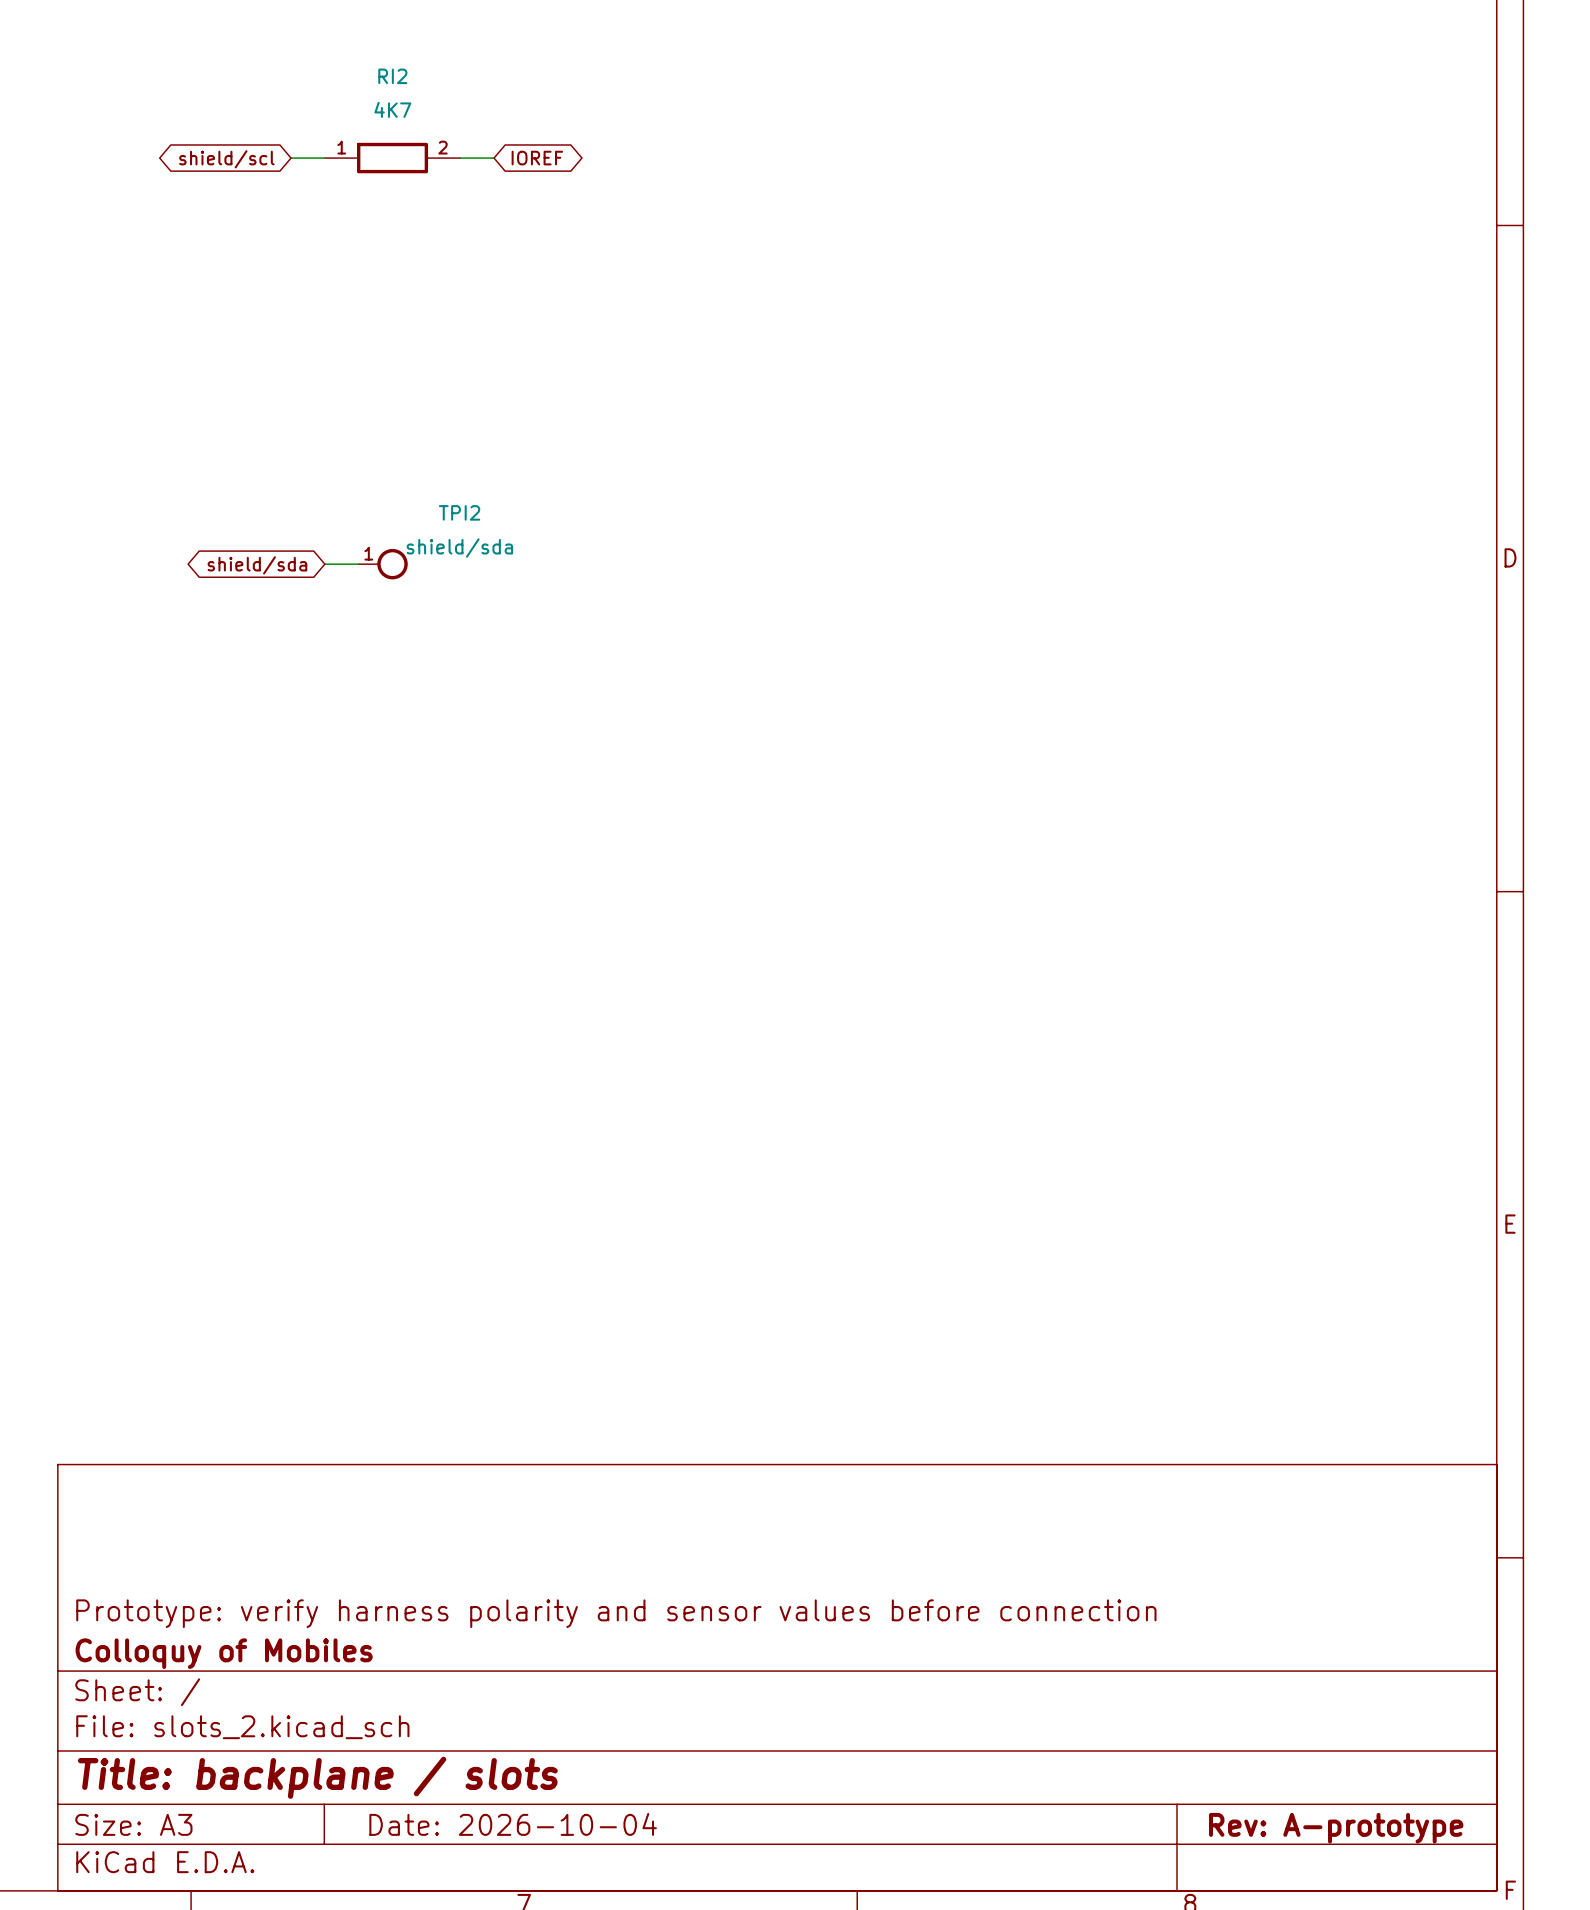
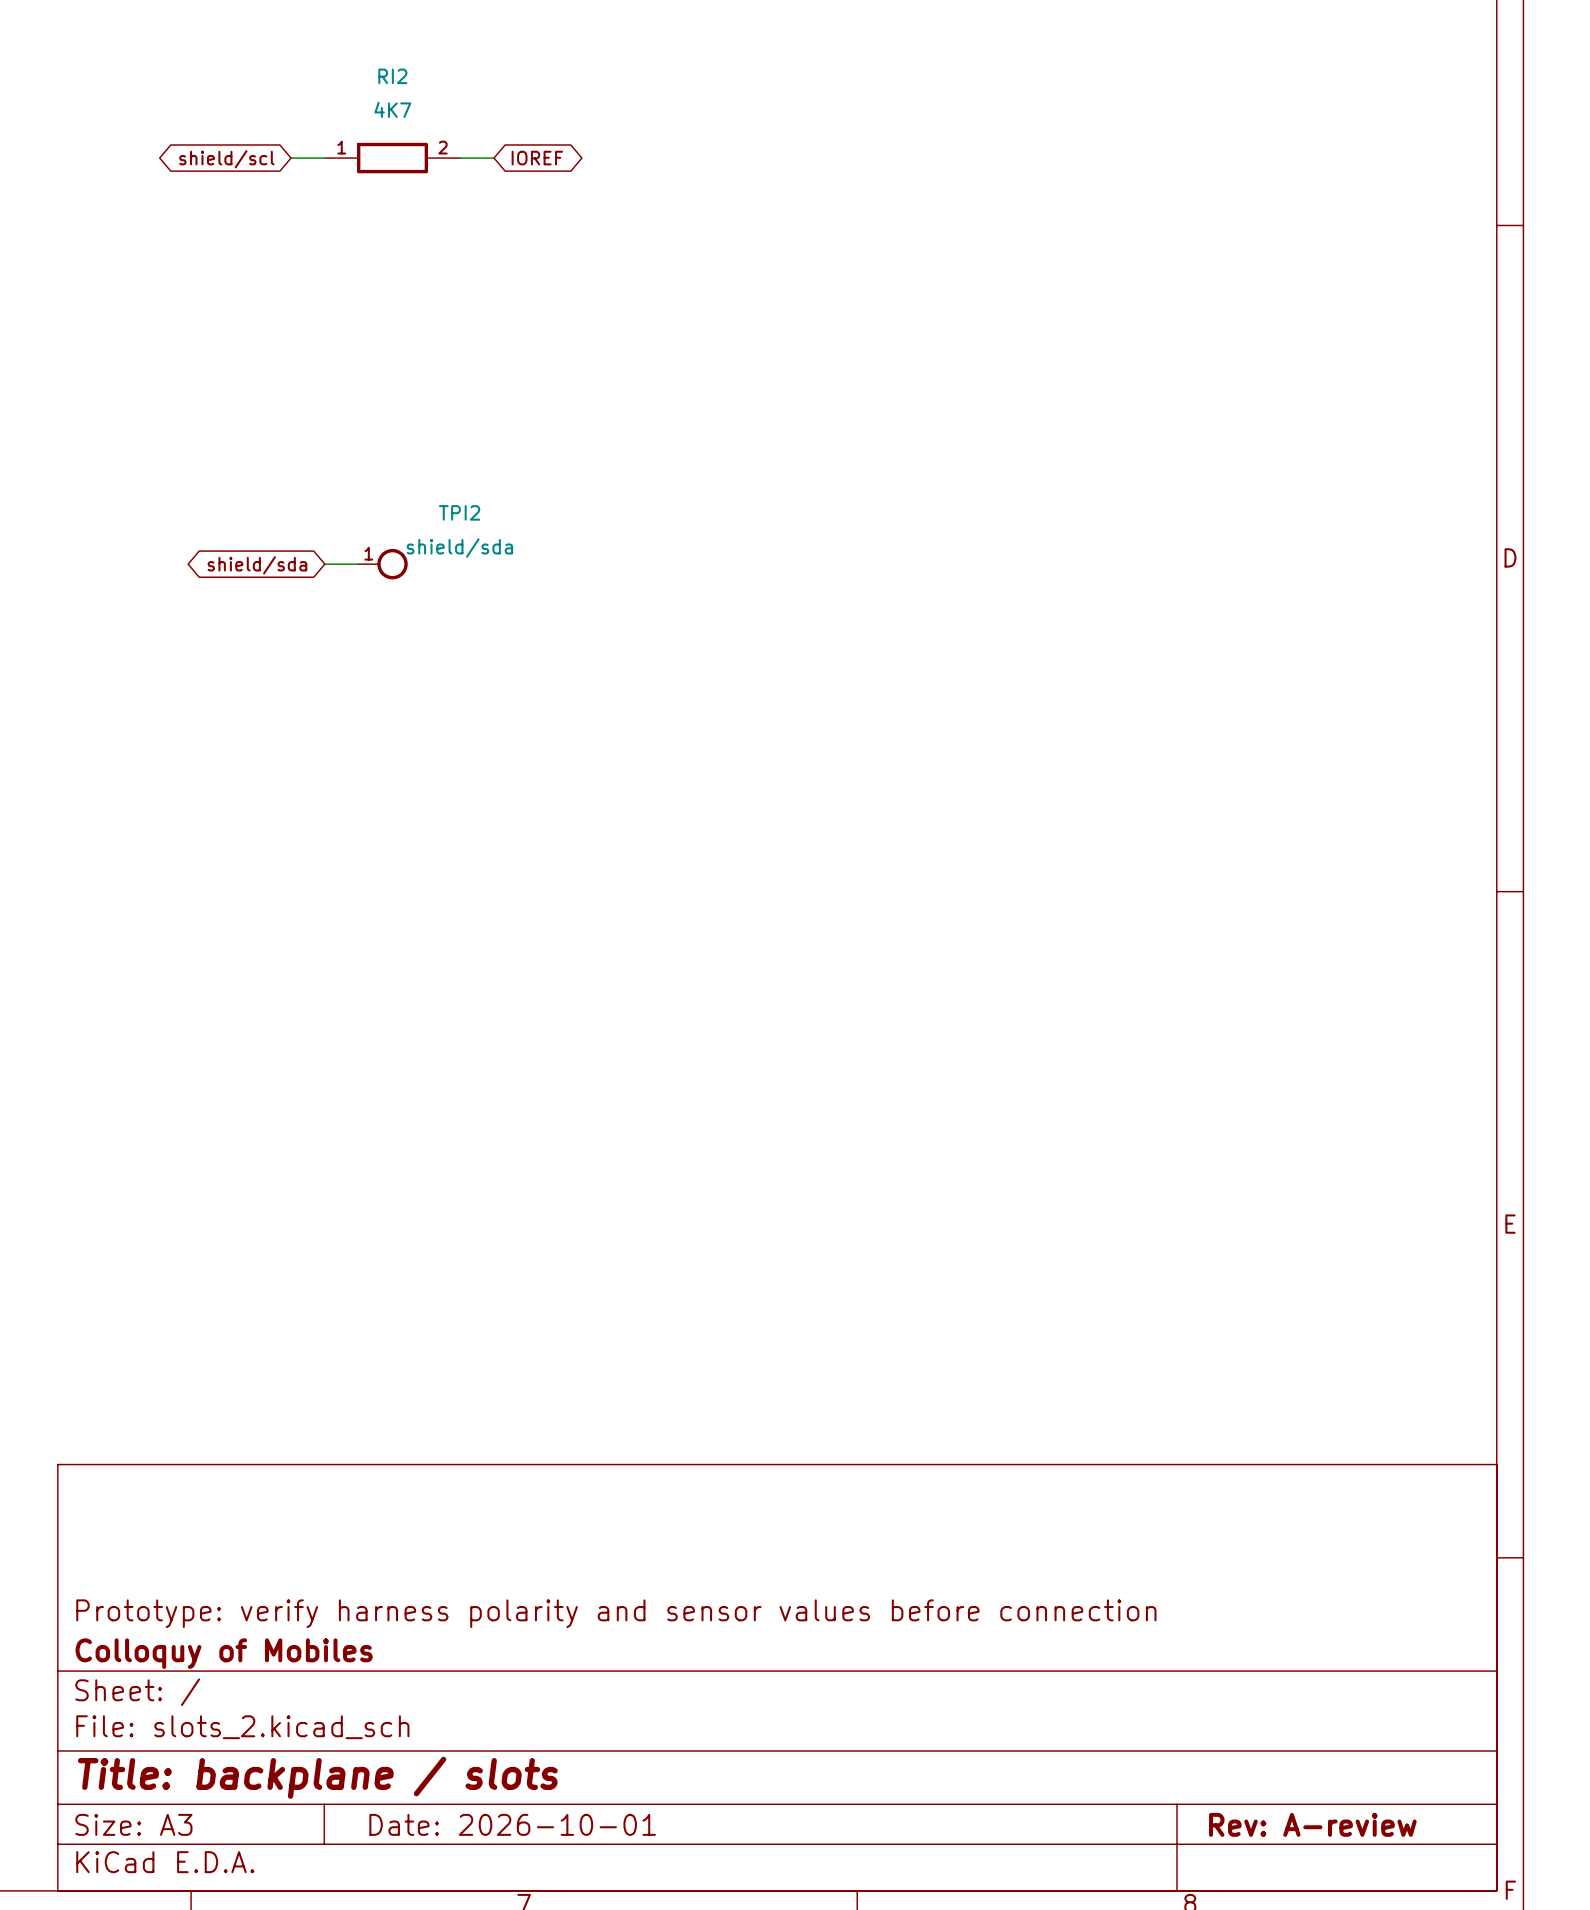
title block: Date: 2026-10-04 (513, 1824) -> Date: 2026-10-01 (512, 1824)
title block: Rev: A-prototype (1336, 1828) -> Rev: A-review (1312, 1824)

